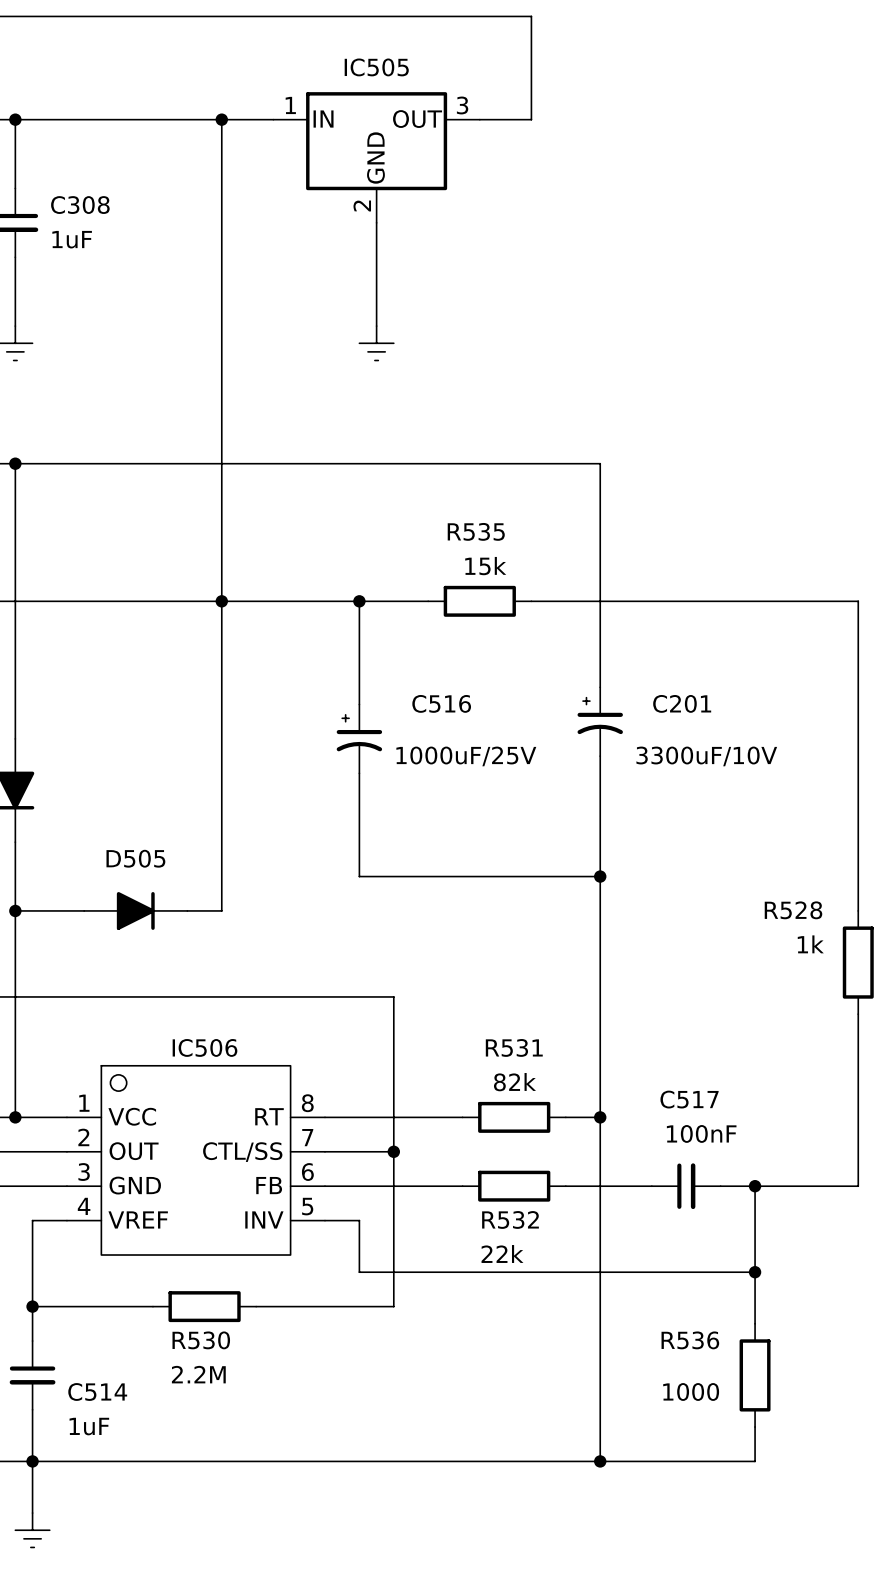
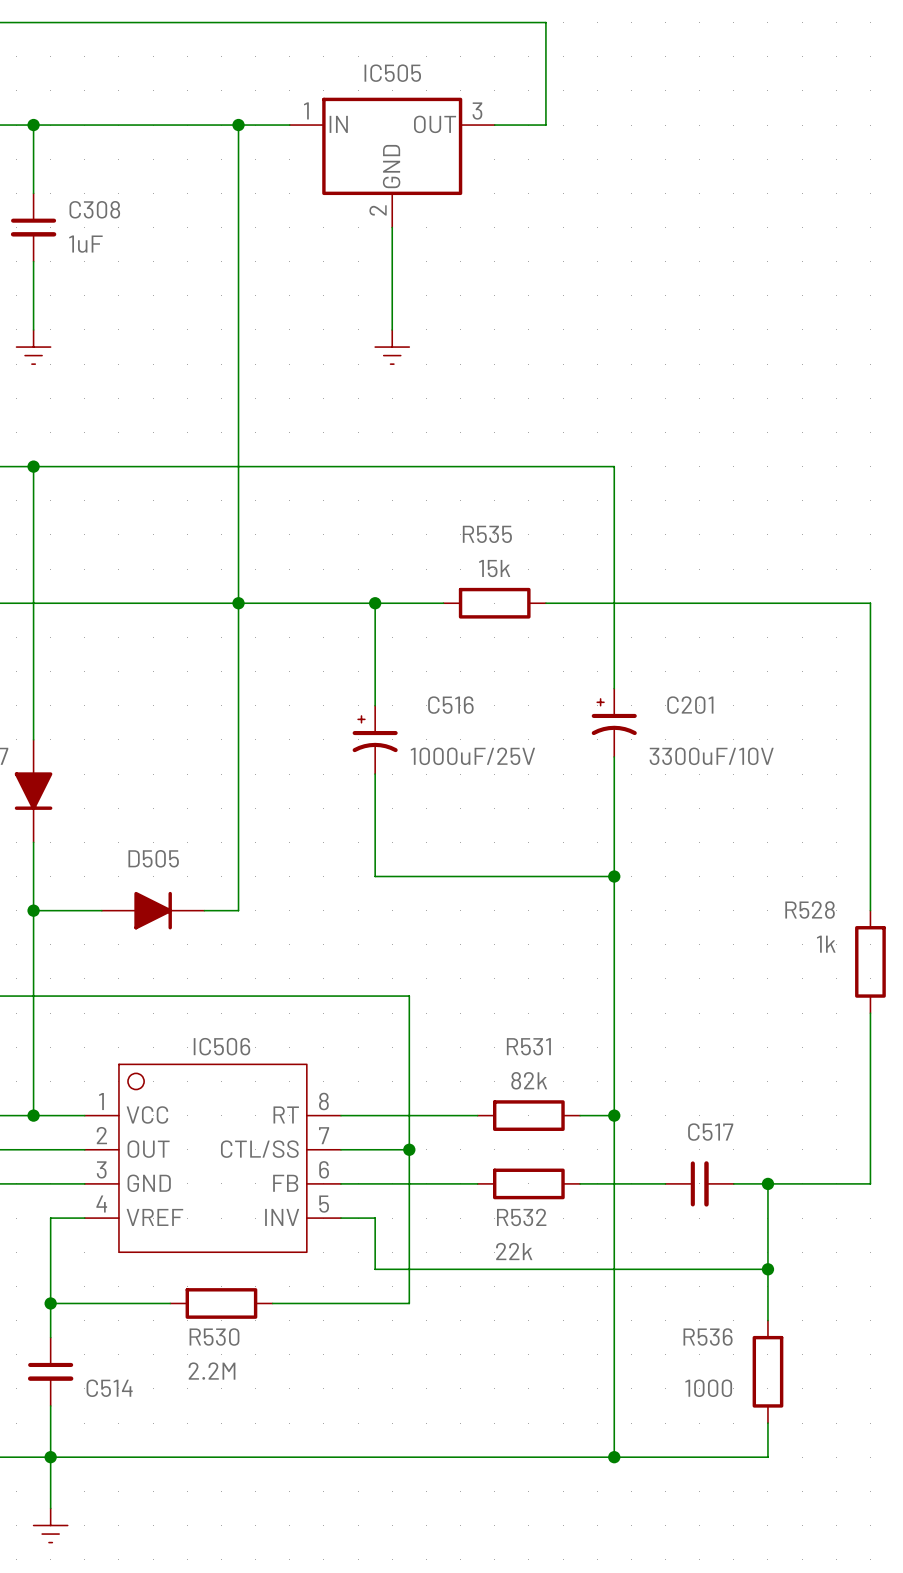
C517 name position: C517 (689, 1099) -> C517 (710, 1132)
C517 value: 100nF (701, 1133) -> none
C514 value: 1uF (89, 1426) -> none

